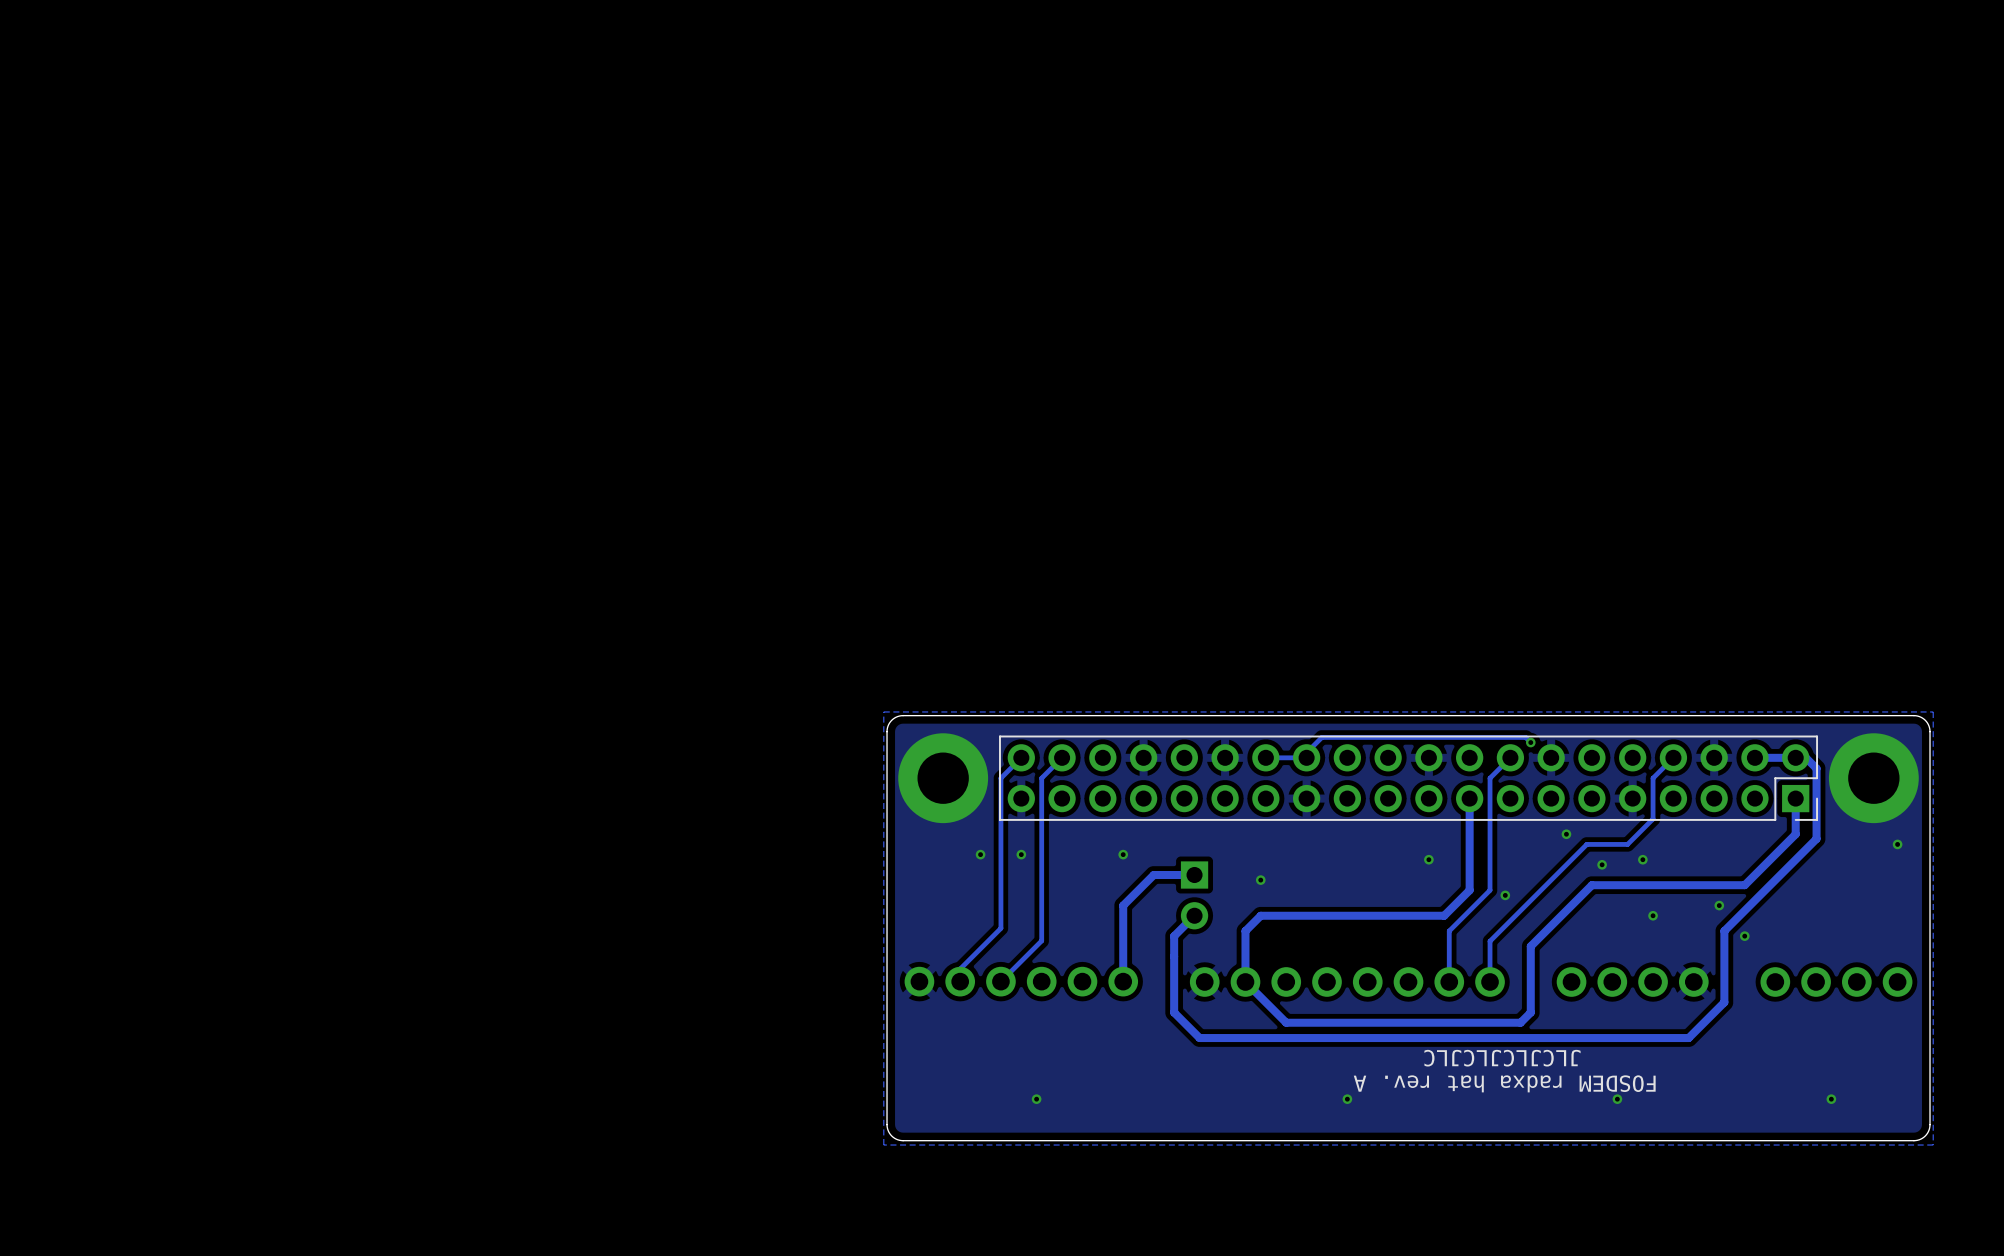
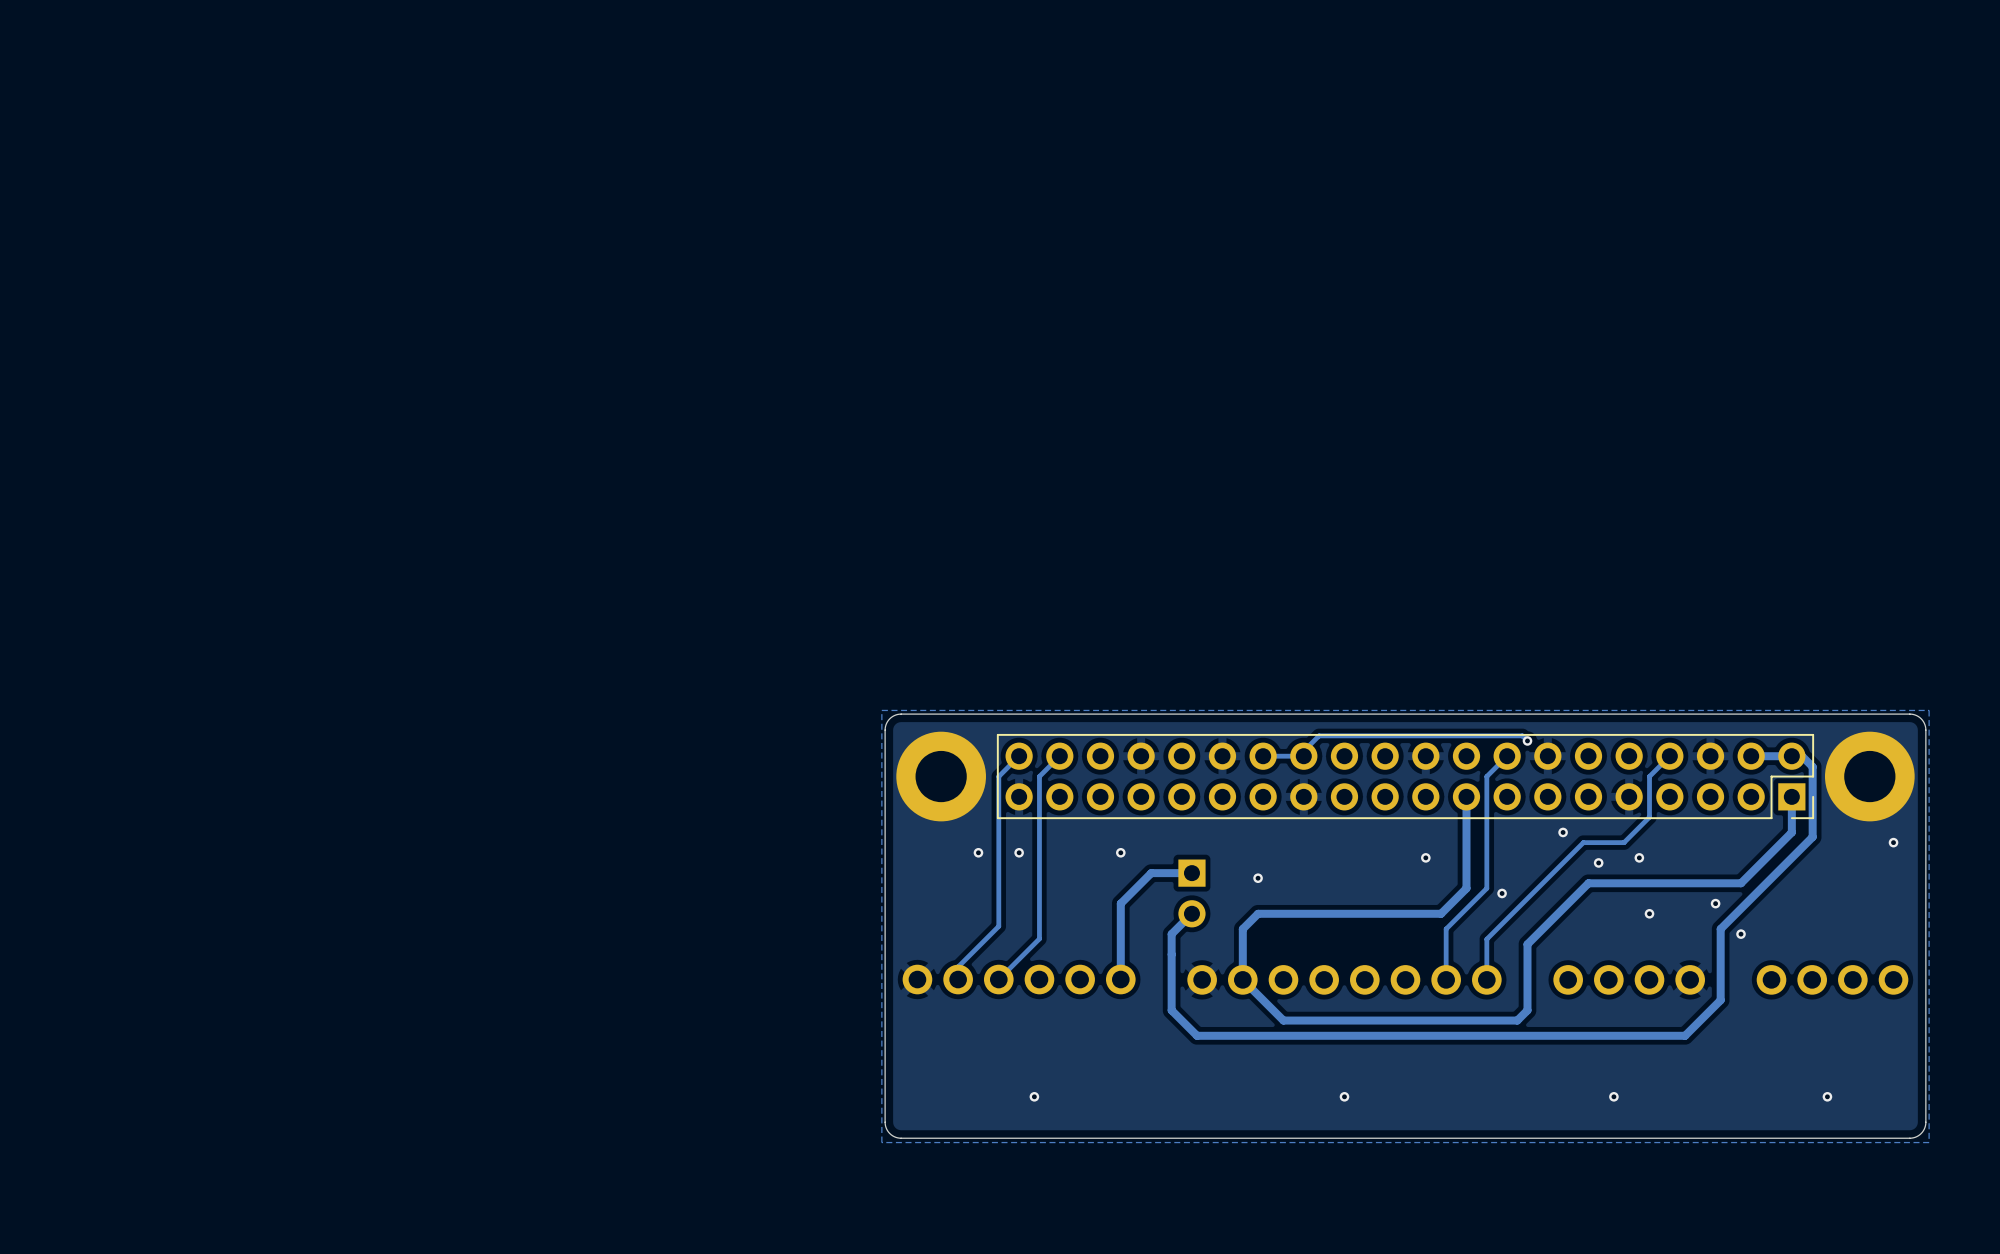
text: JLCJLCJLCJLC (1502, 1058) -> none
text: FOSDEM radxa hat rev. A (1504, 1083) -> none

